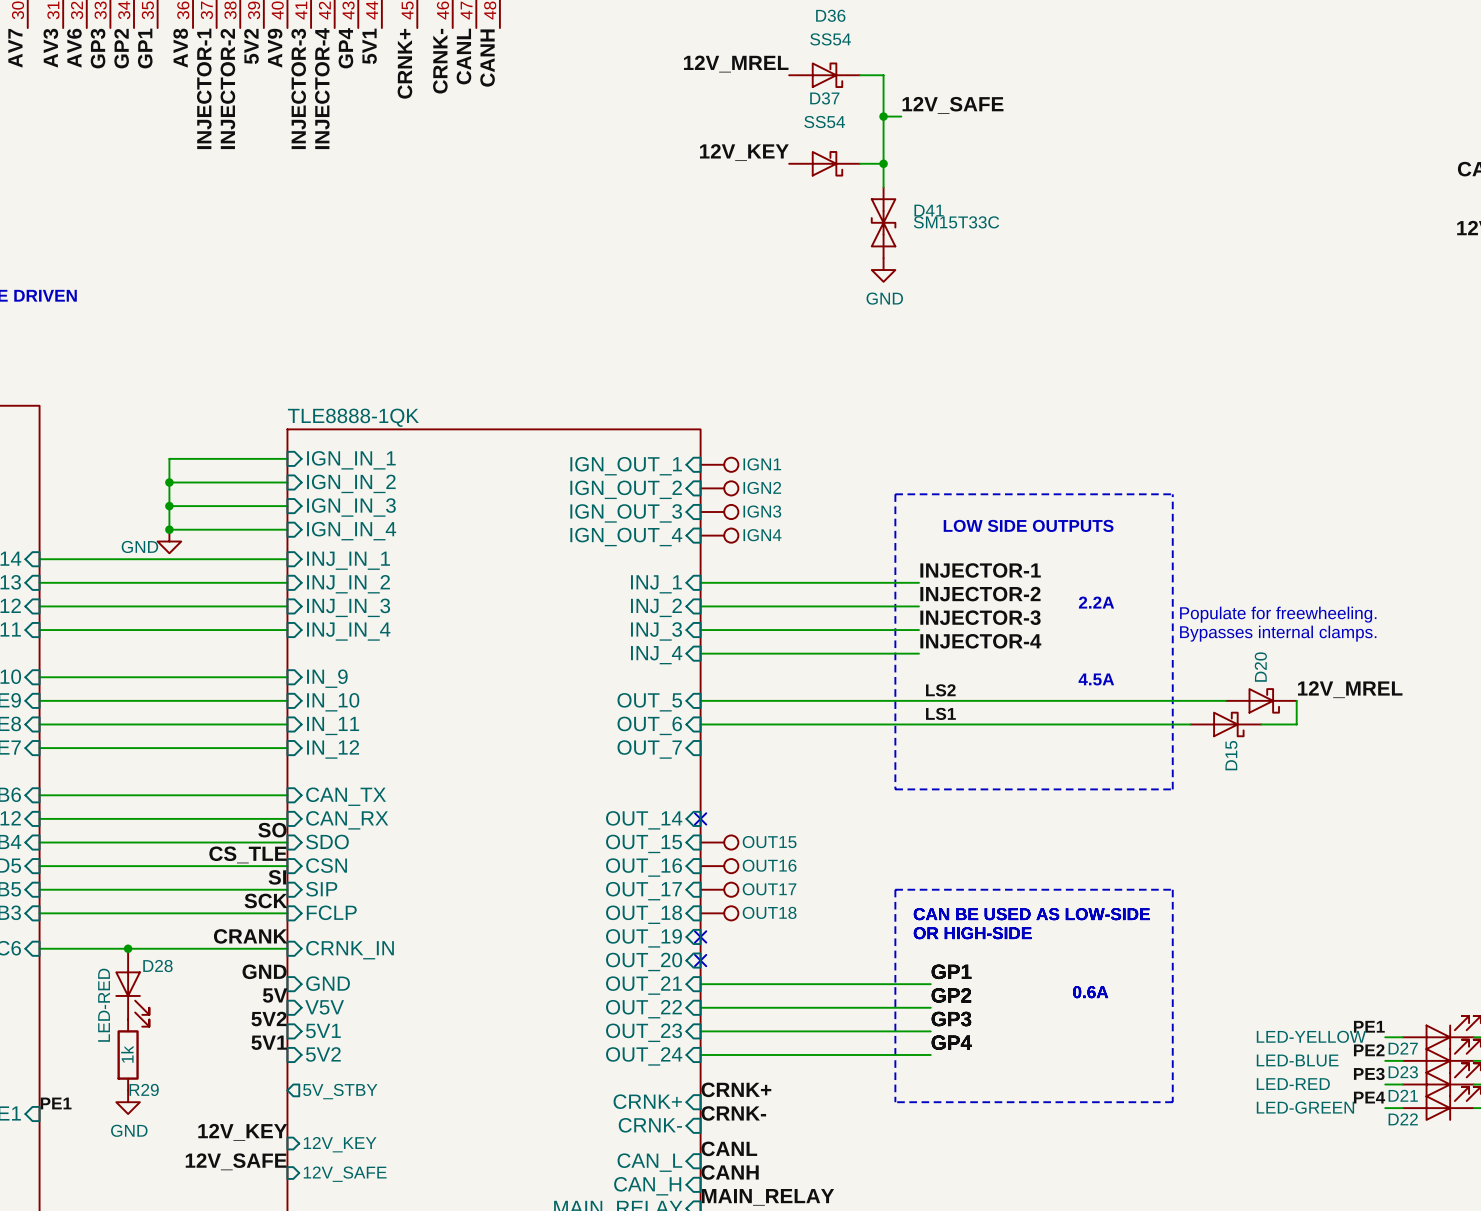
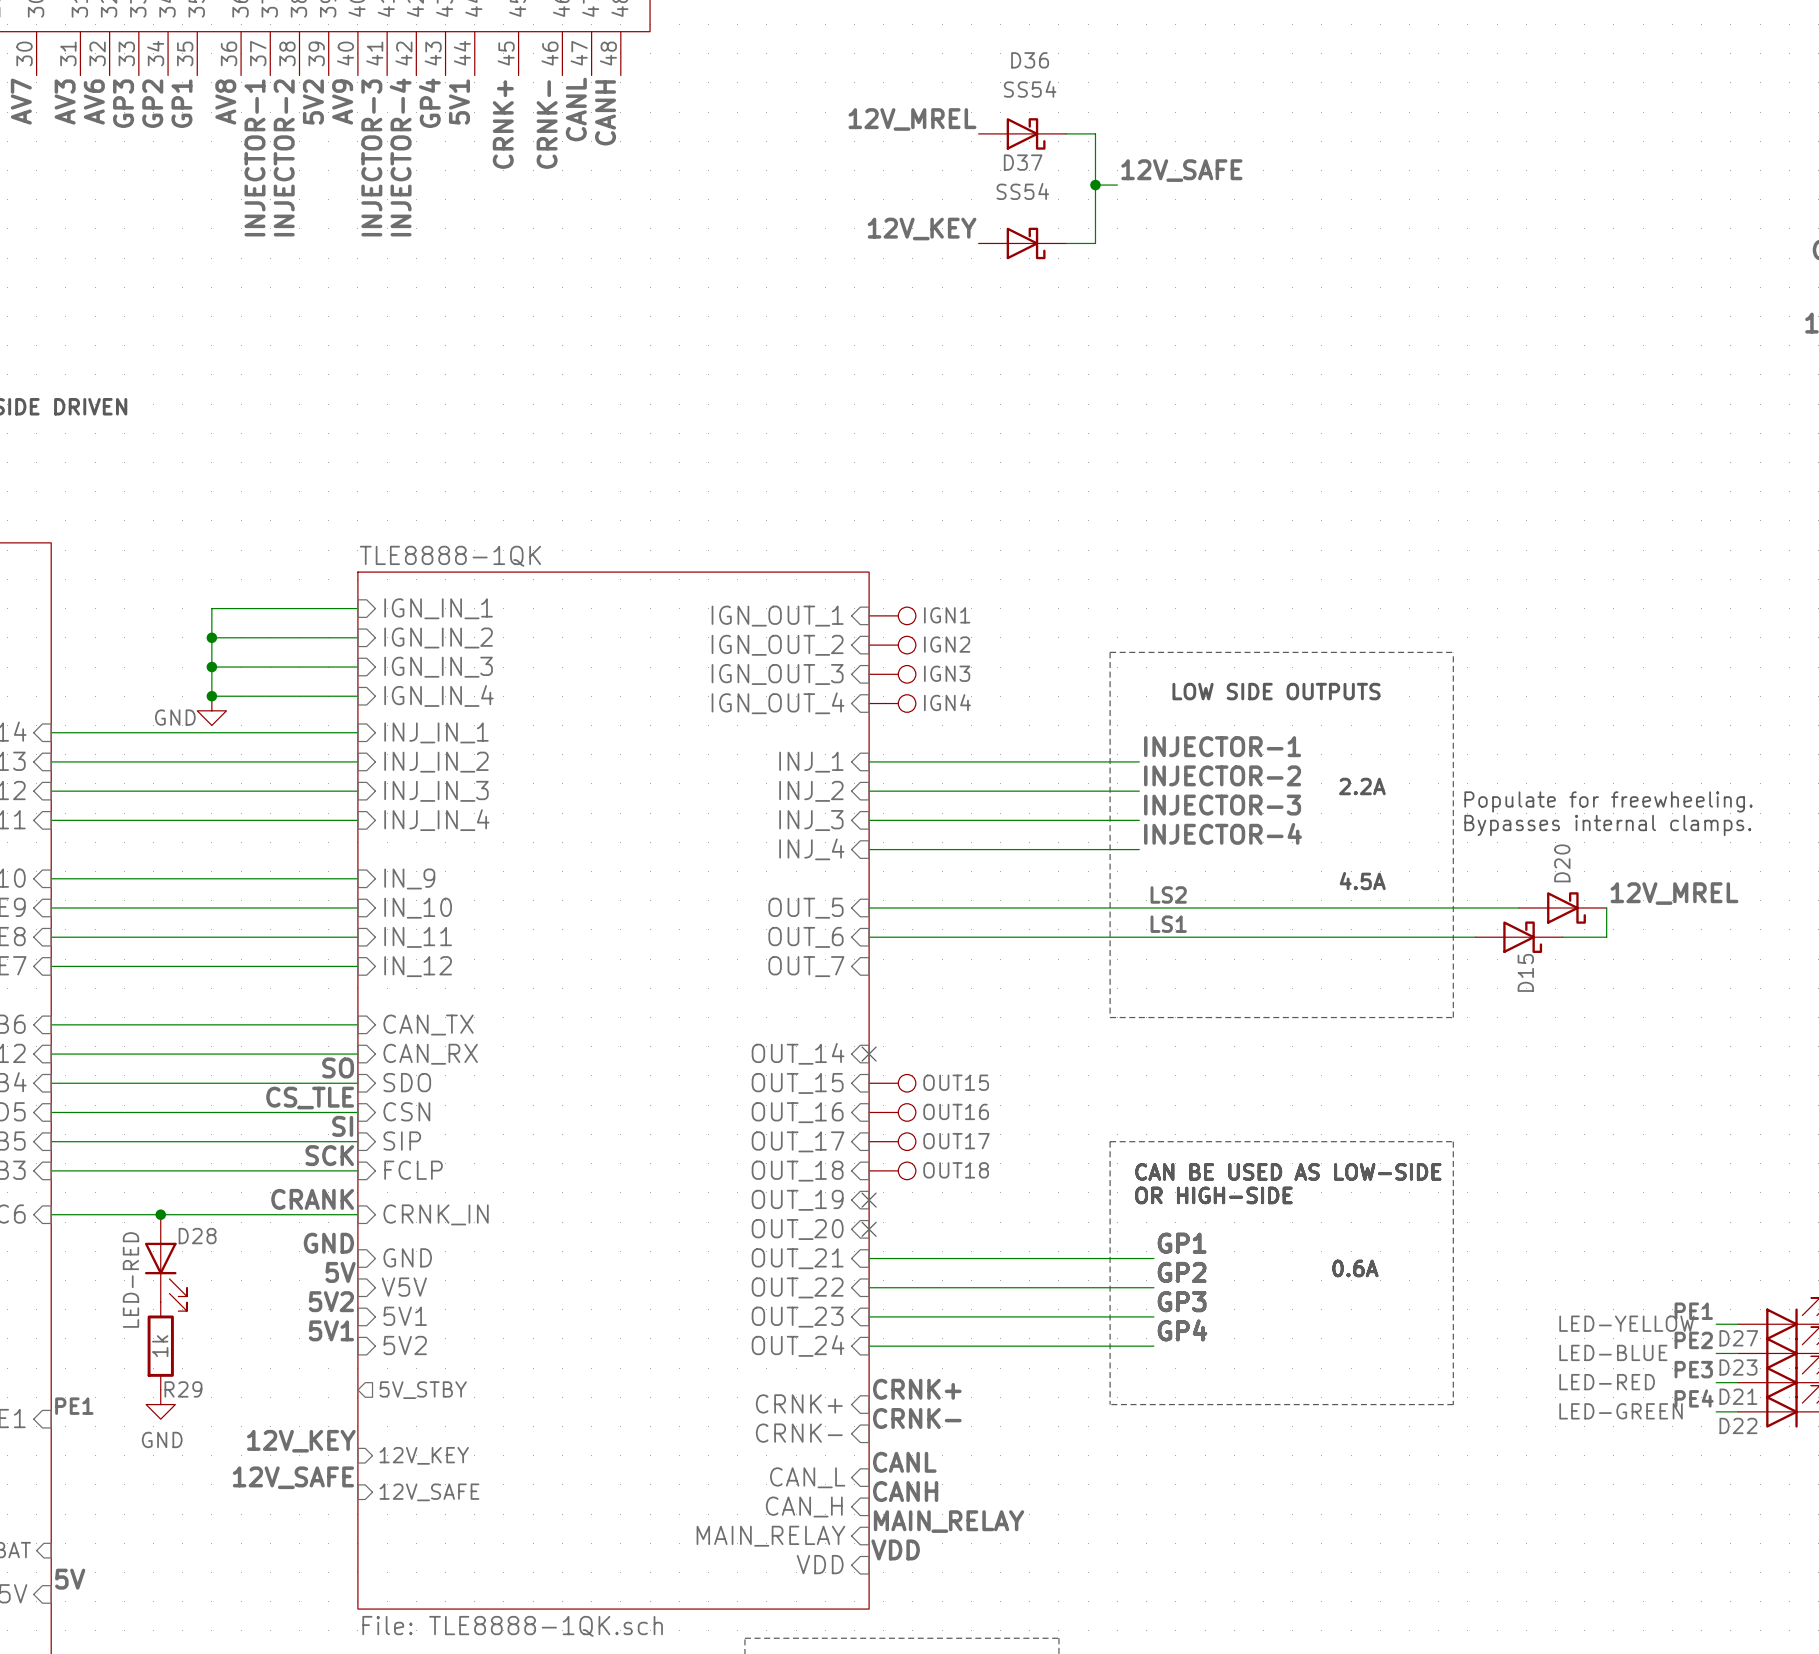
wire: (883, 163) (883, 187) -> none
junction: (883, 163) -> none
D41: SM15T33C (883, 222) -> none
power symbol: GND (883, 270) -> none

